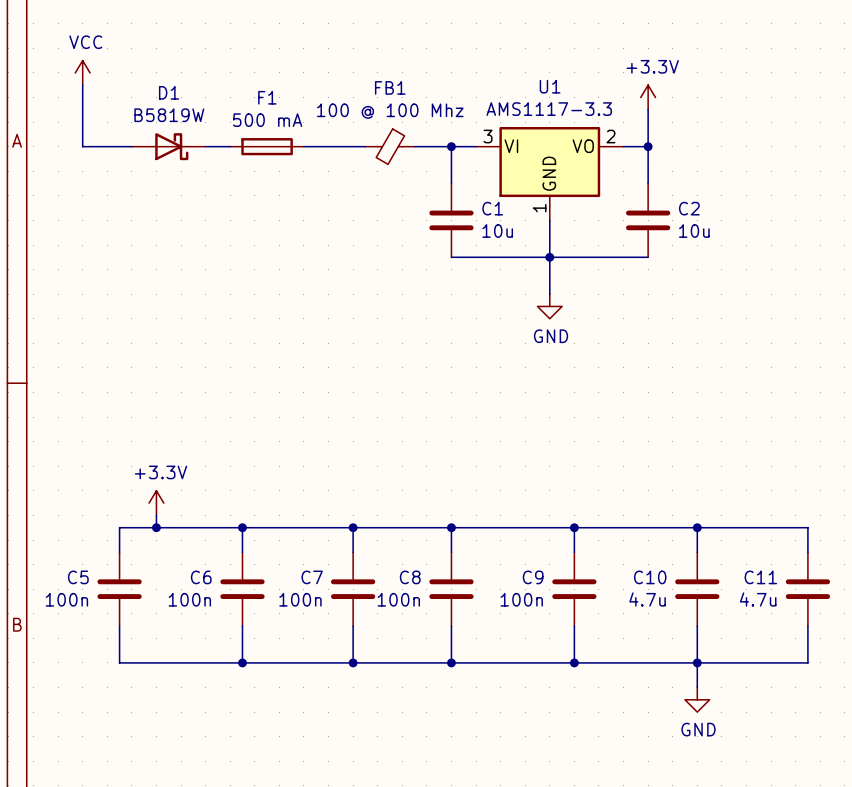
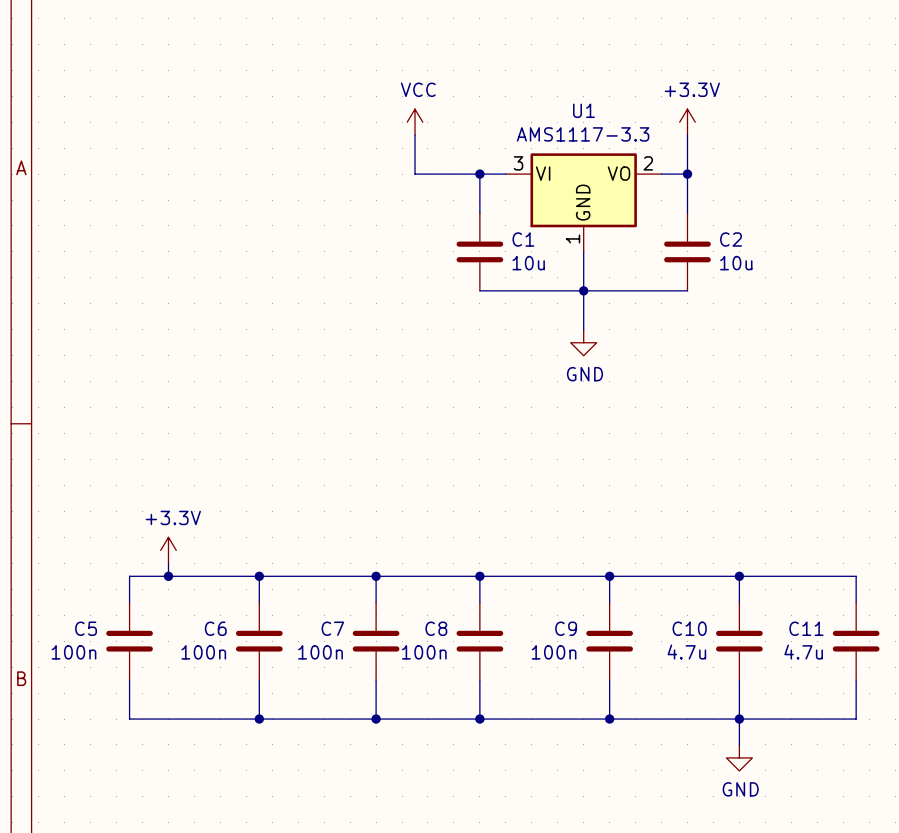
power symbol: VCC (82, 72) -> none
wire: (82, 85) (82, 146) (131, 146) -> none
power symbol: none -> VCC (415, 122)
wire: none -> (415, 135) (415, 174) (440, 174)
D1: B5819W (168, 146) -> none
wire: (205, 146) (230, 146) -> none
F1: 500 mA (267, 146) -> none
wire: (303, 146) (365, 146) -> none
FB1: 100 @ 100 Mhz (389, 146) -> none

